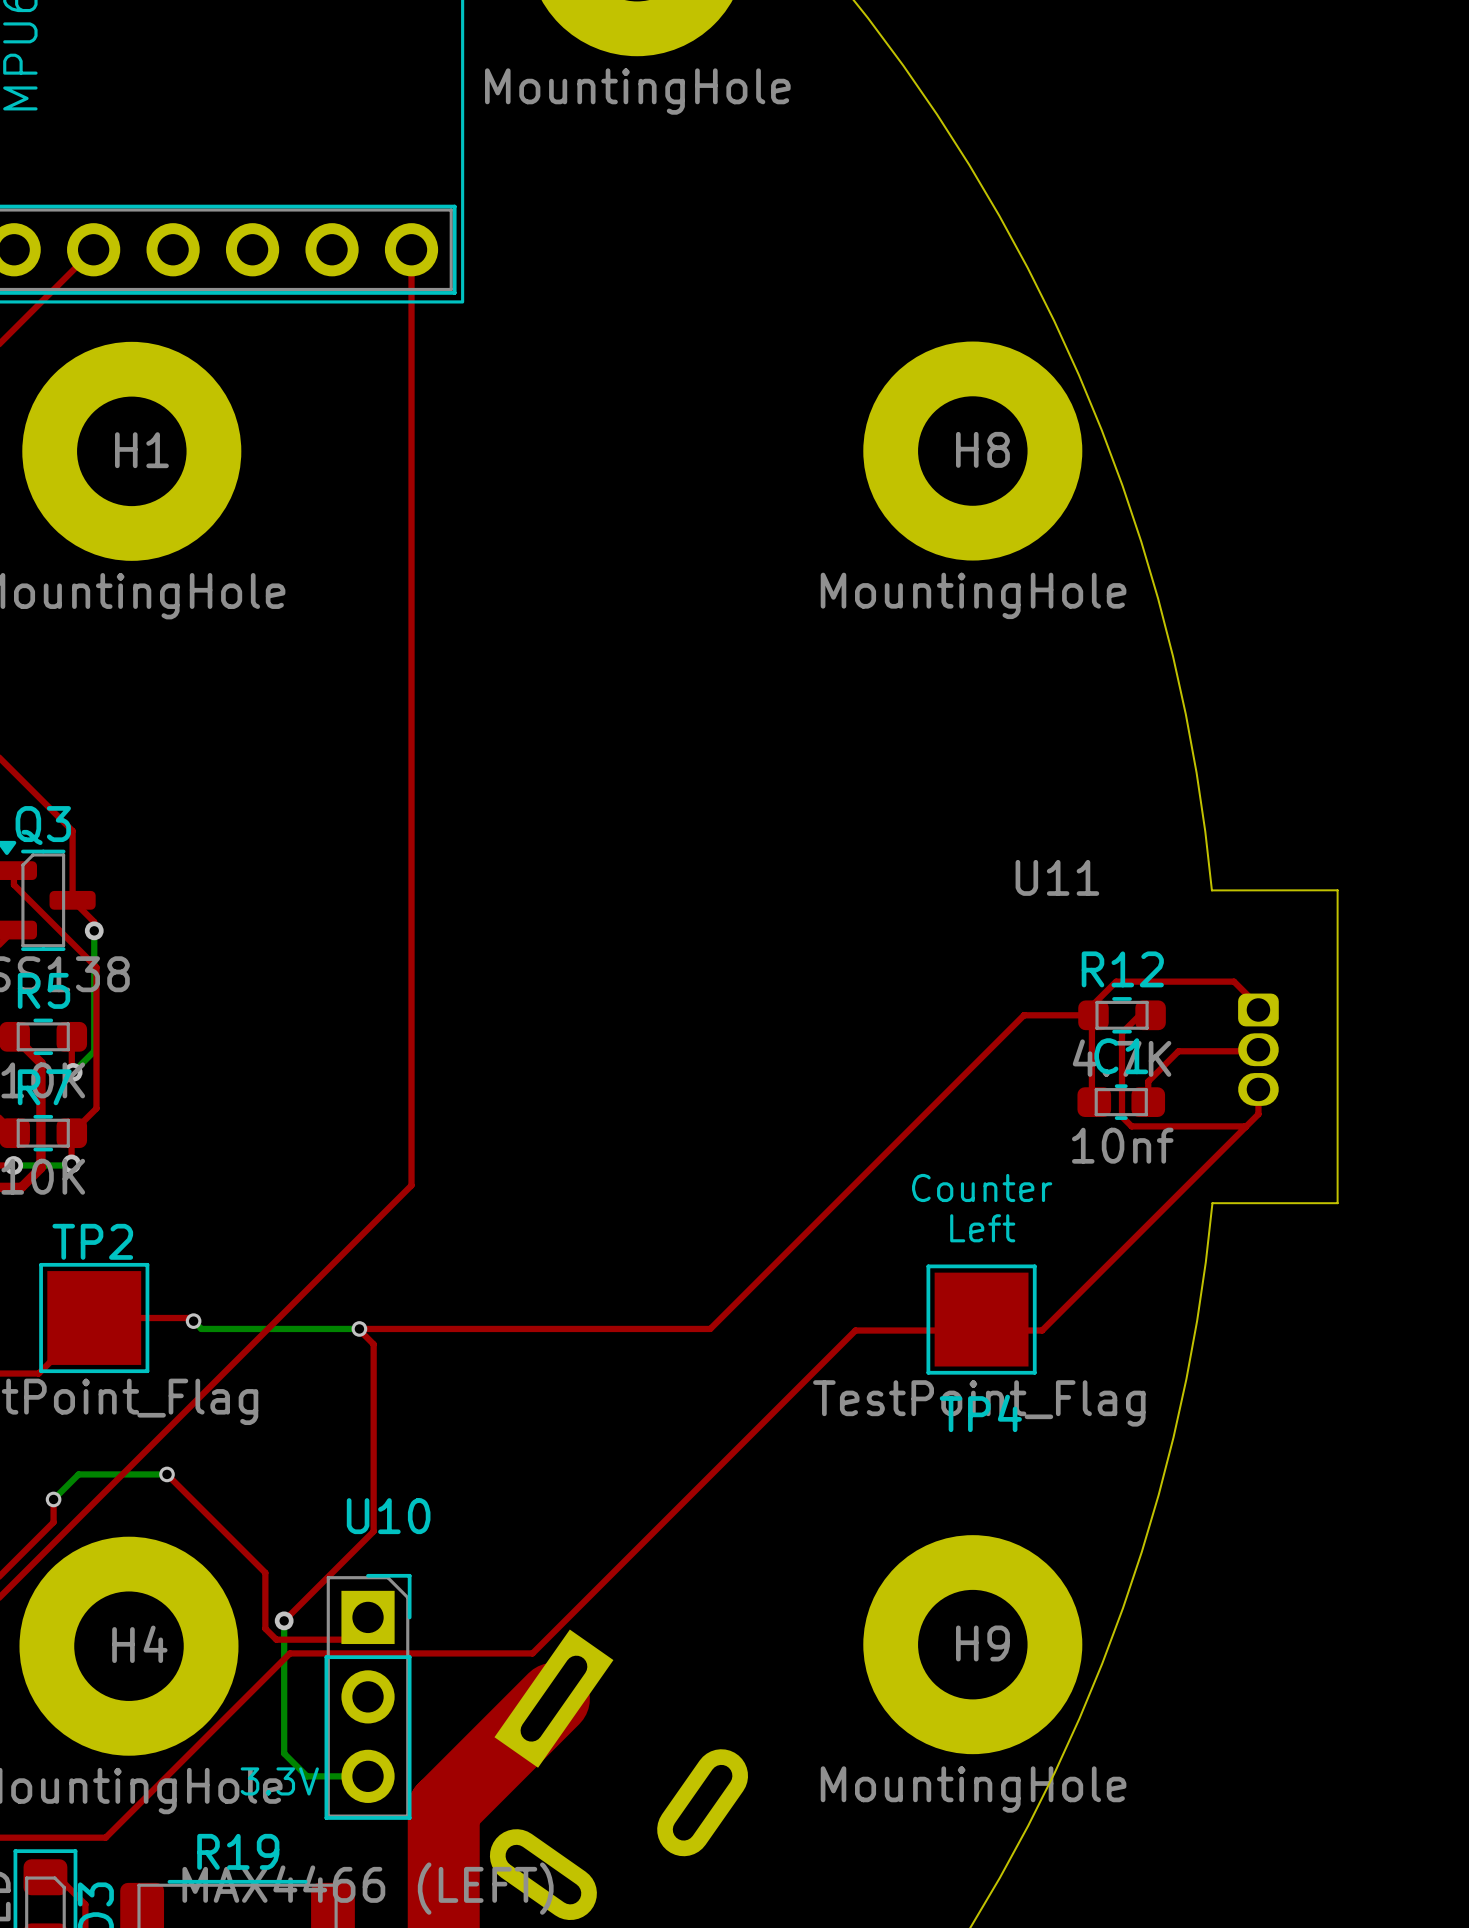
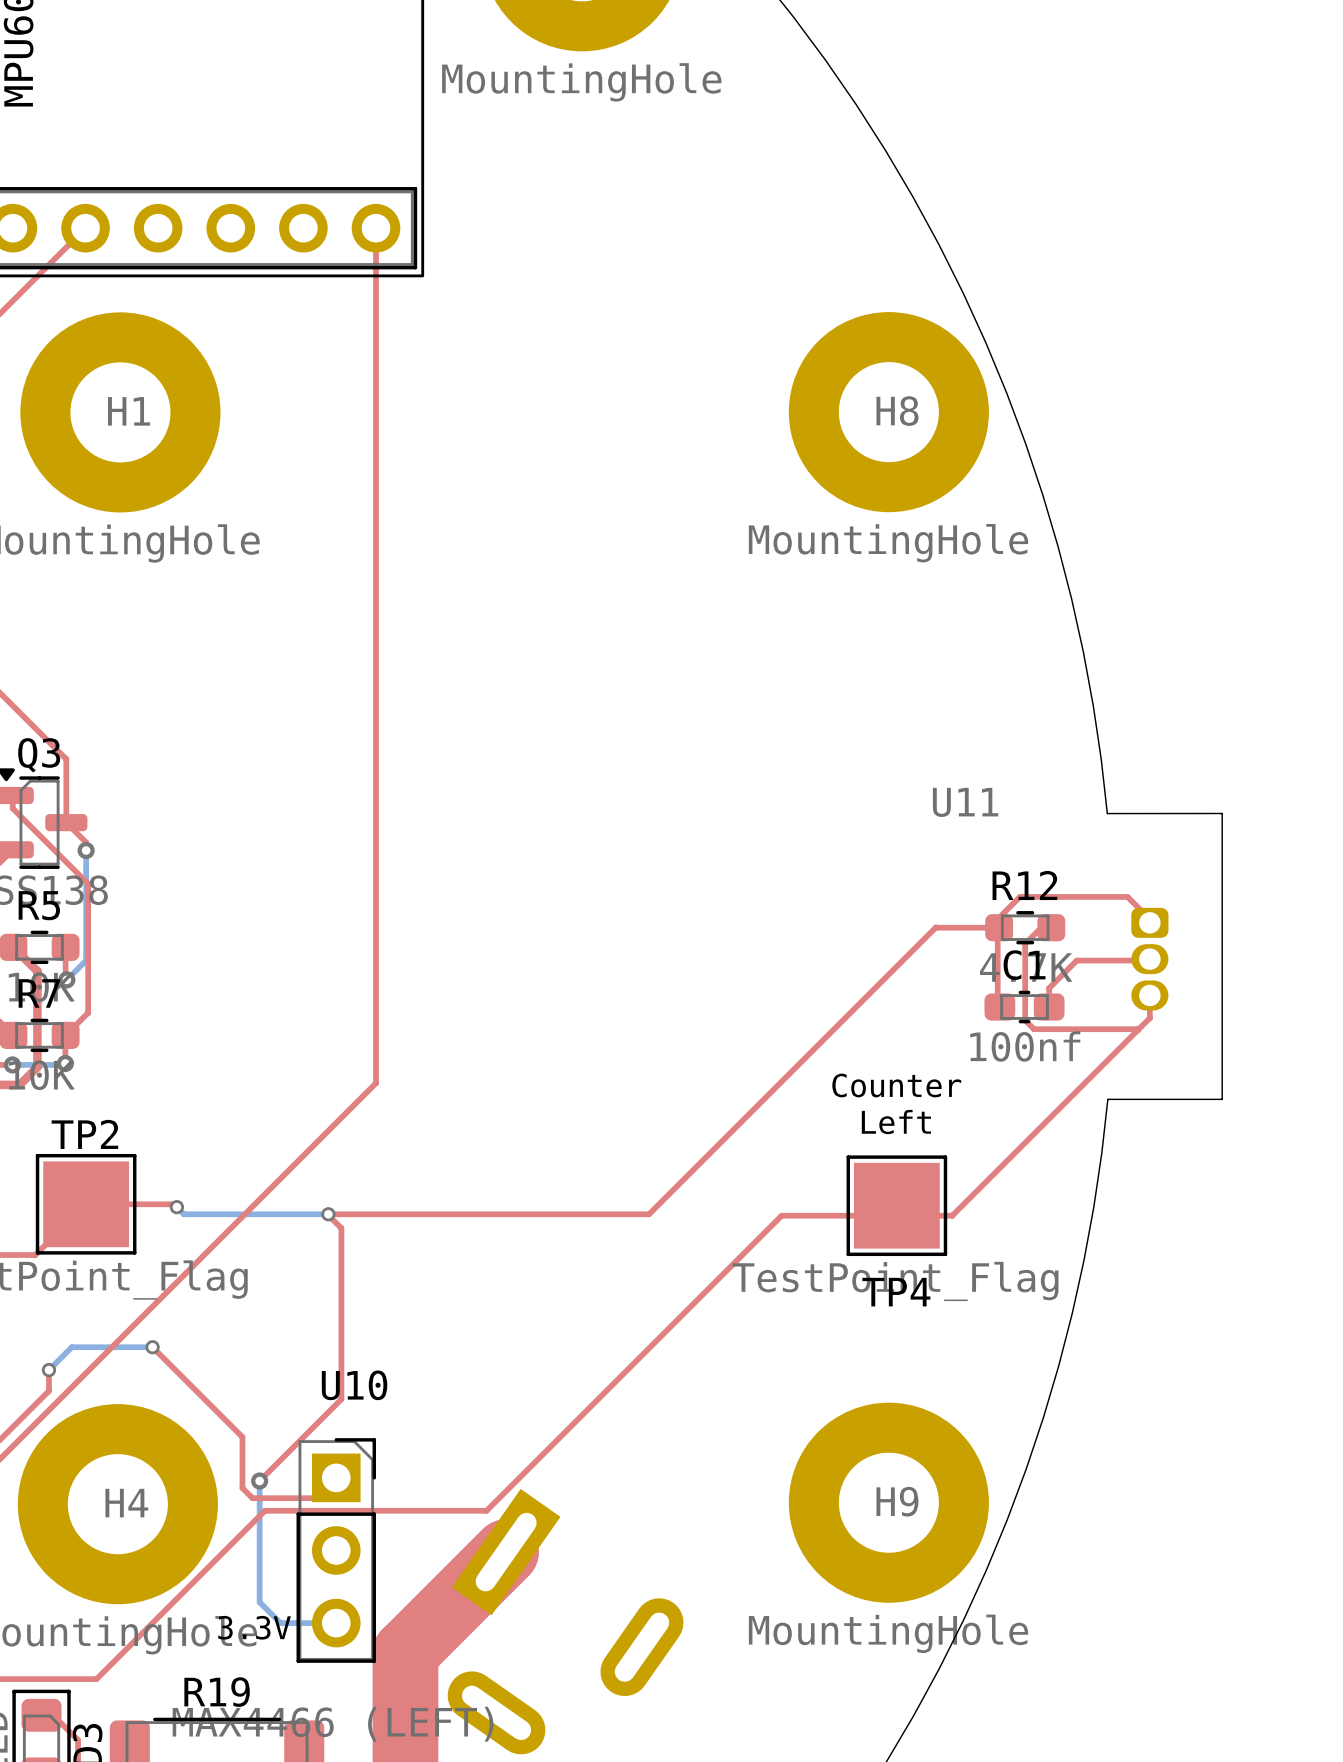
C1 value: 10nf (1122, 1145) -> 100nf (1025, 1046)

